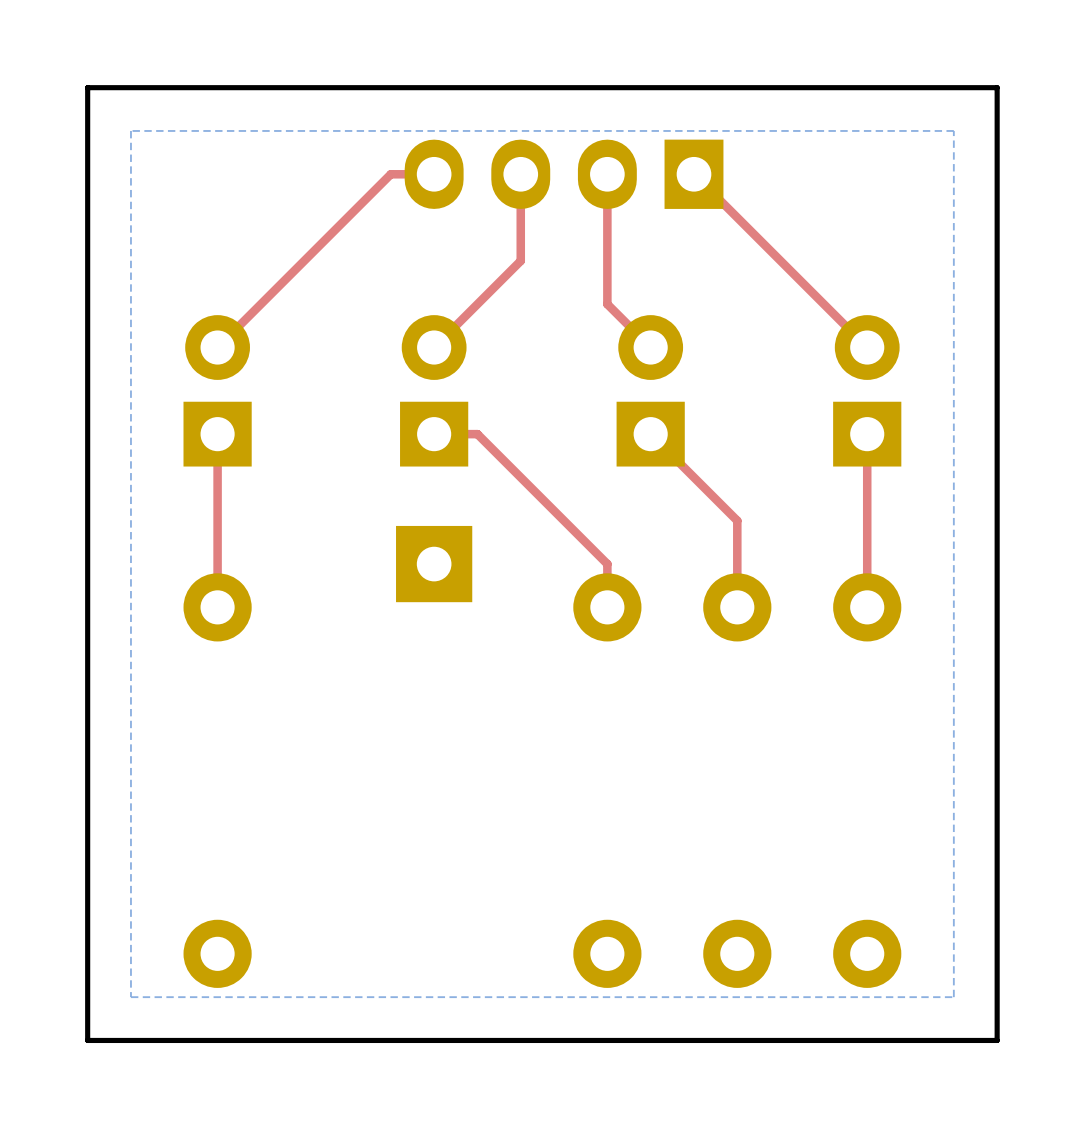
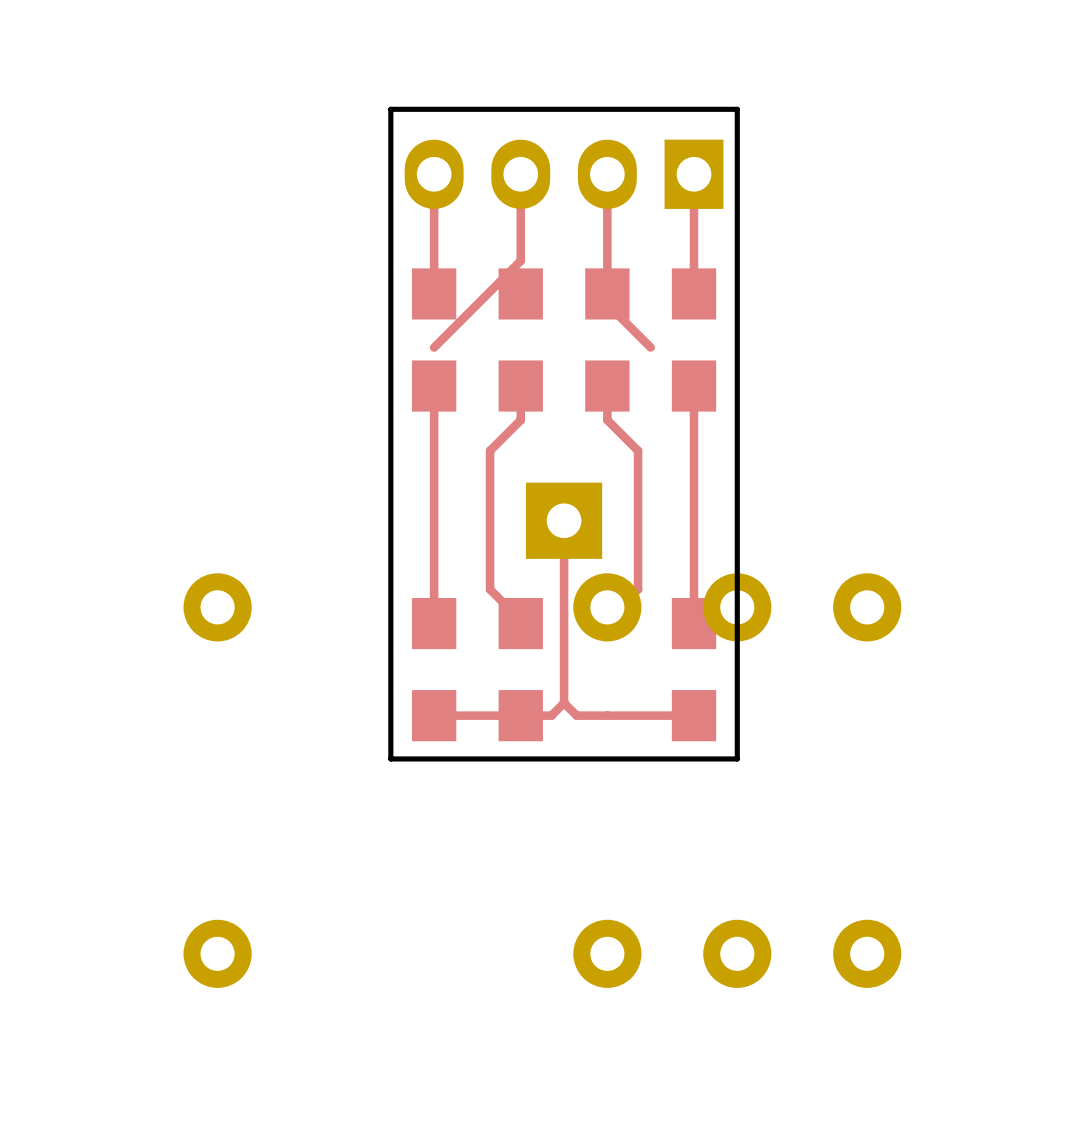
board edge: (997, 87) (997, 1040) (87, 1040) (87, 87) (997, 87) -> none
board edge: none -> (737, 109) (737, 758) (390, 758) (390, 109) (737, 109)
bottom zone outline: (953, 130) (953, 997) (130, 997) (130, 130) (953, 130) -> none
top track: (434, 174) (390, 174) (217, 347) -> (434, 174) (434, 304)
top track: (693, 174) (867, 347) -> (693, 174) (693, 304)
part: none -> (434, 339)
part: none -> (520, 339)
part: none -> (607, 339)
part: none -> (693, 339)
top track: none -> (607, 375) (607, 420) (638, 450) (638, 589) (607, 620) (607, 623)
top track: none -> (434, 386) (434, 623)
top track: none -> (520, 386) (520, 420) (490, 450) (490, 589) (520, 620) (520, 623)
top track: none -> (693, 386) (693, 623)
part: (217, 390) -> none
part: (434, 390) -> none
part: (650, 390) -> none
part: (867, 390) -> none
top track: (217, 434) (217, 607) -> none
top track: (434, 434) (477, 434) (607, 564) (607, 607) -> none
top track: (650, 434) (737, 520) (737, 607) -> none
top track: (867, 434) (867, 607) -> none
top track: none -> (564, 520) (564, 703)
part position: (434, 564) -> (564, 520)
part: none -> (434, 669)
part: none -> (520, 669)
part: none -> (693, 669)
top track: none -> (564, 703) (576, 715) (693, 715)
top track: none -> (564, 703) (551, 715) (434, 715)

